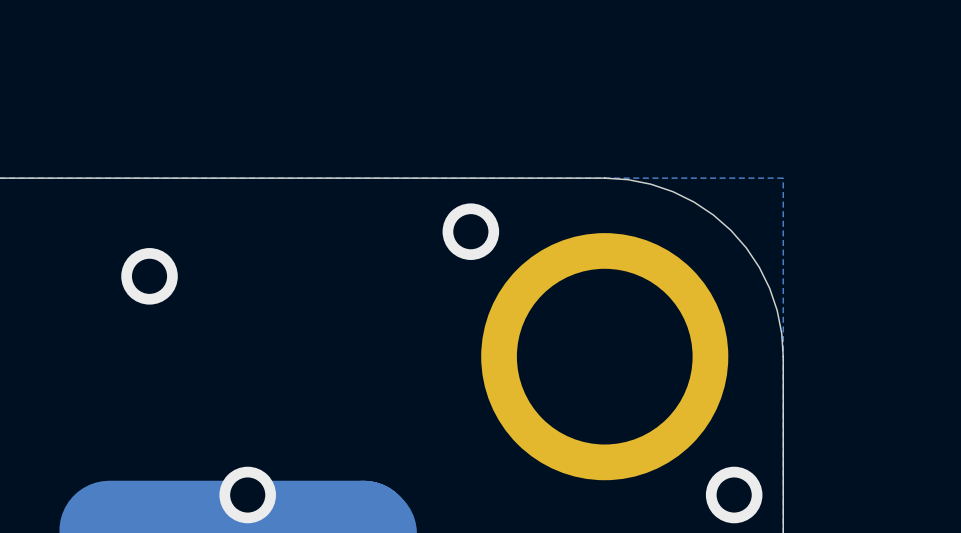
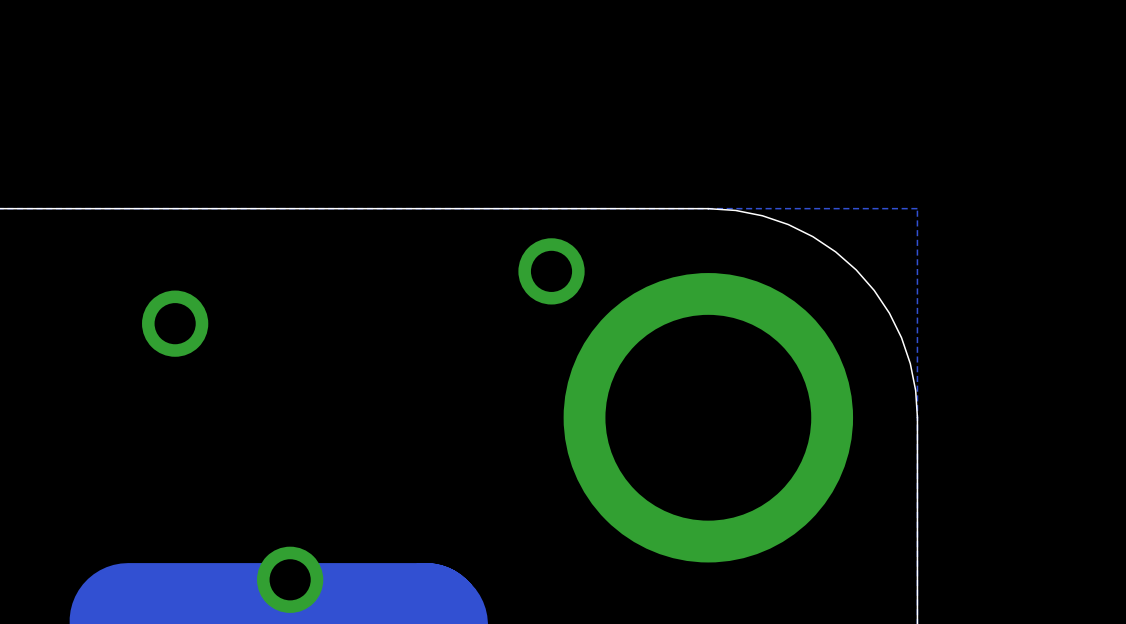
via: (734, 495) -> none

